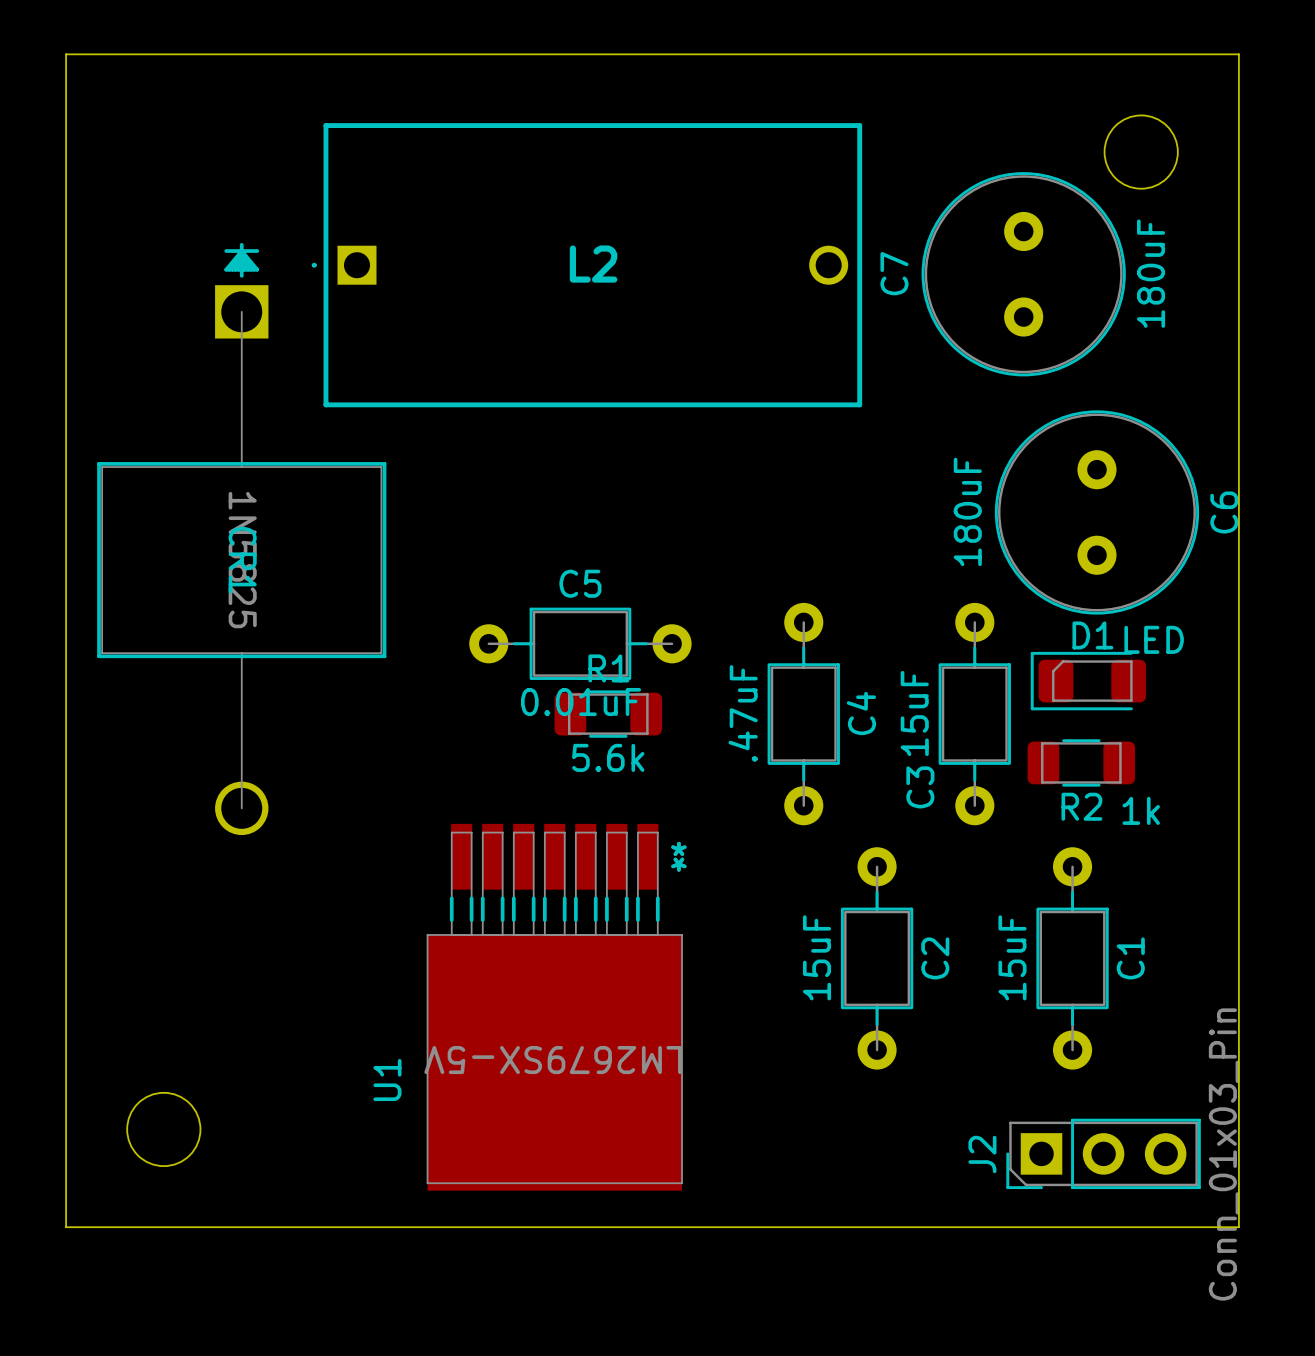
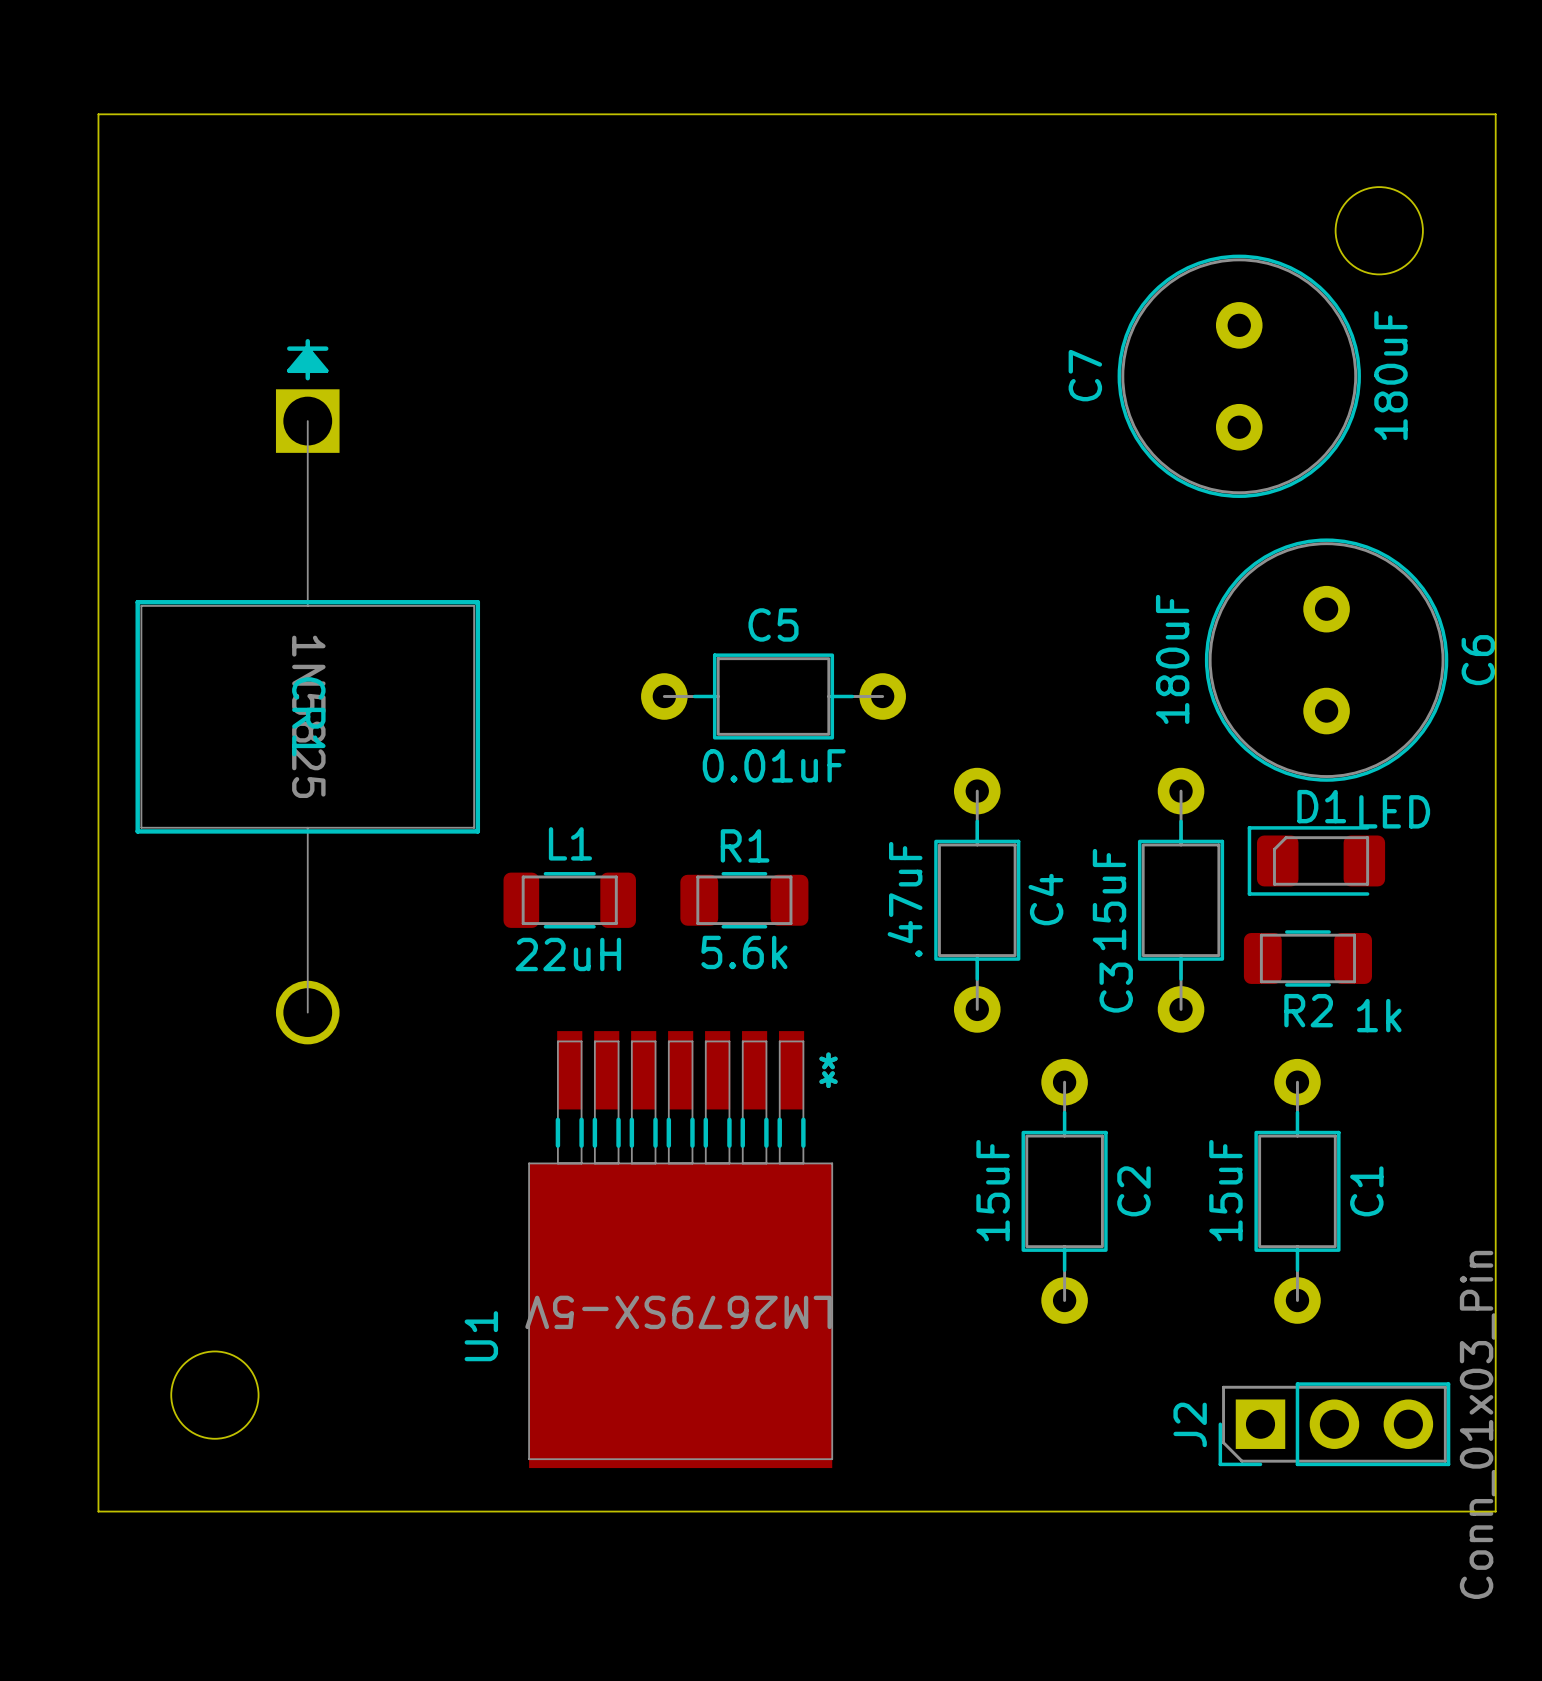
L2: (586, 265) -> none
C5 position: (580, 643) -> (773, 696)
L1: none -> 22uH (569, 900)

